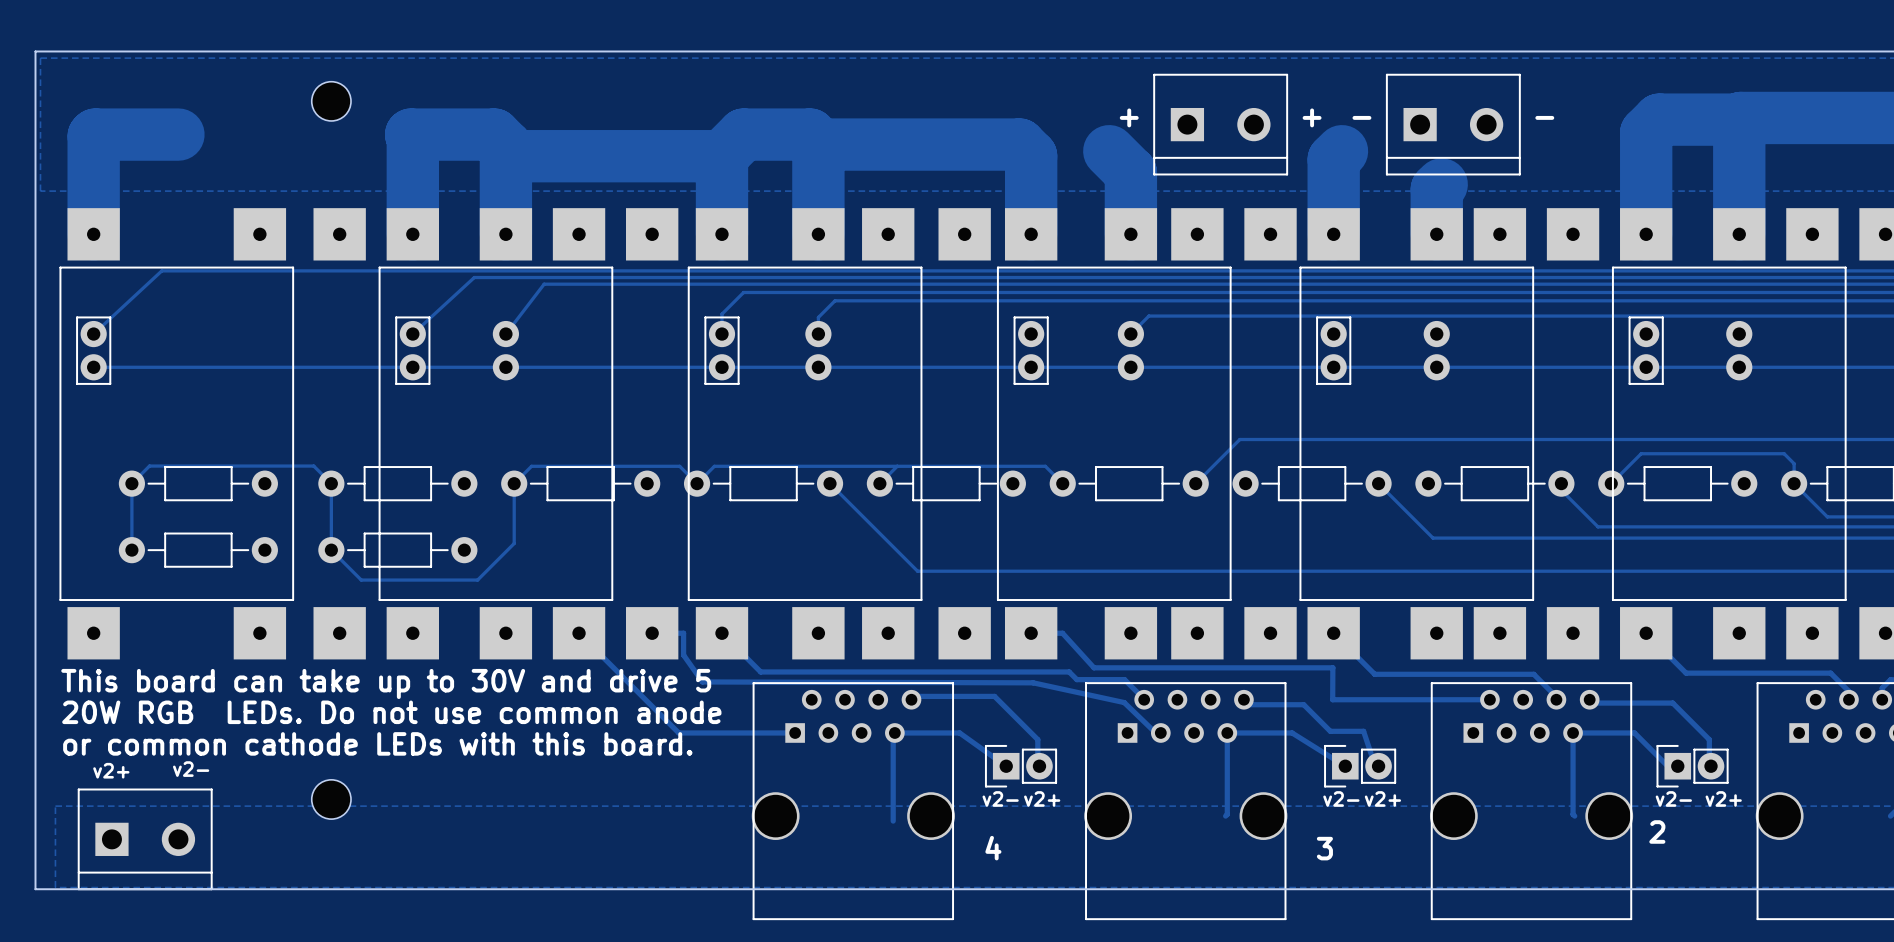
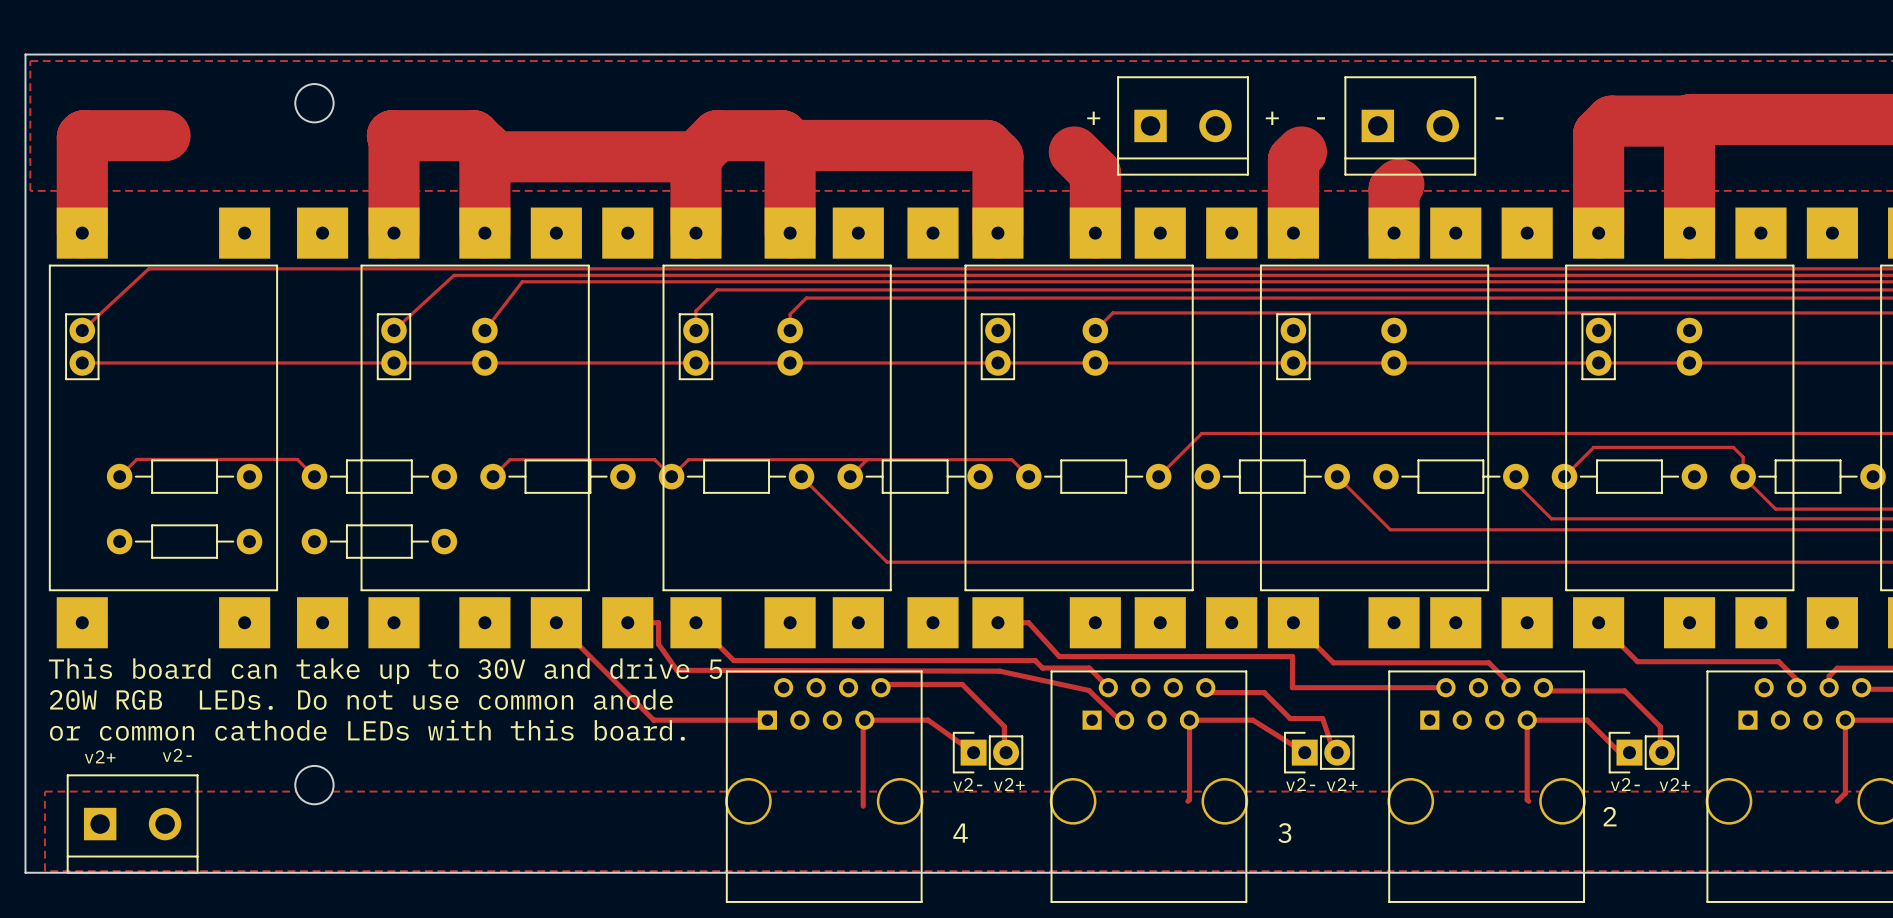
track: (131, 483) (131, 550) -> none
track: (331, 483) (331, 550) (361, 580) (477, 580) (514, 543) (514, 483) -> none

